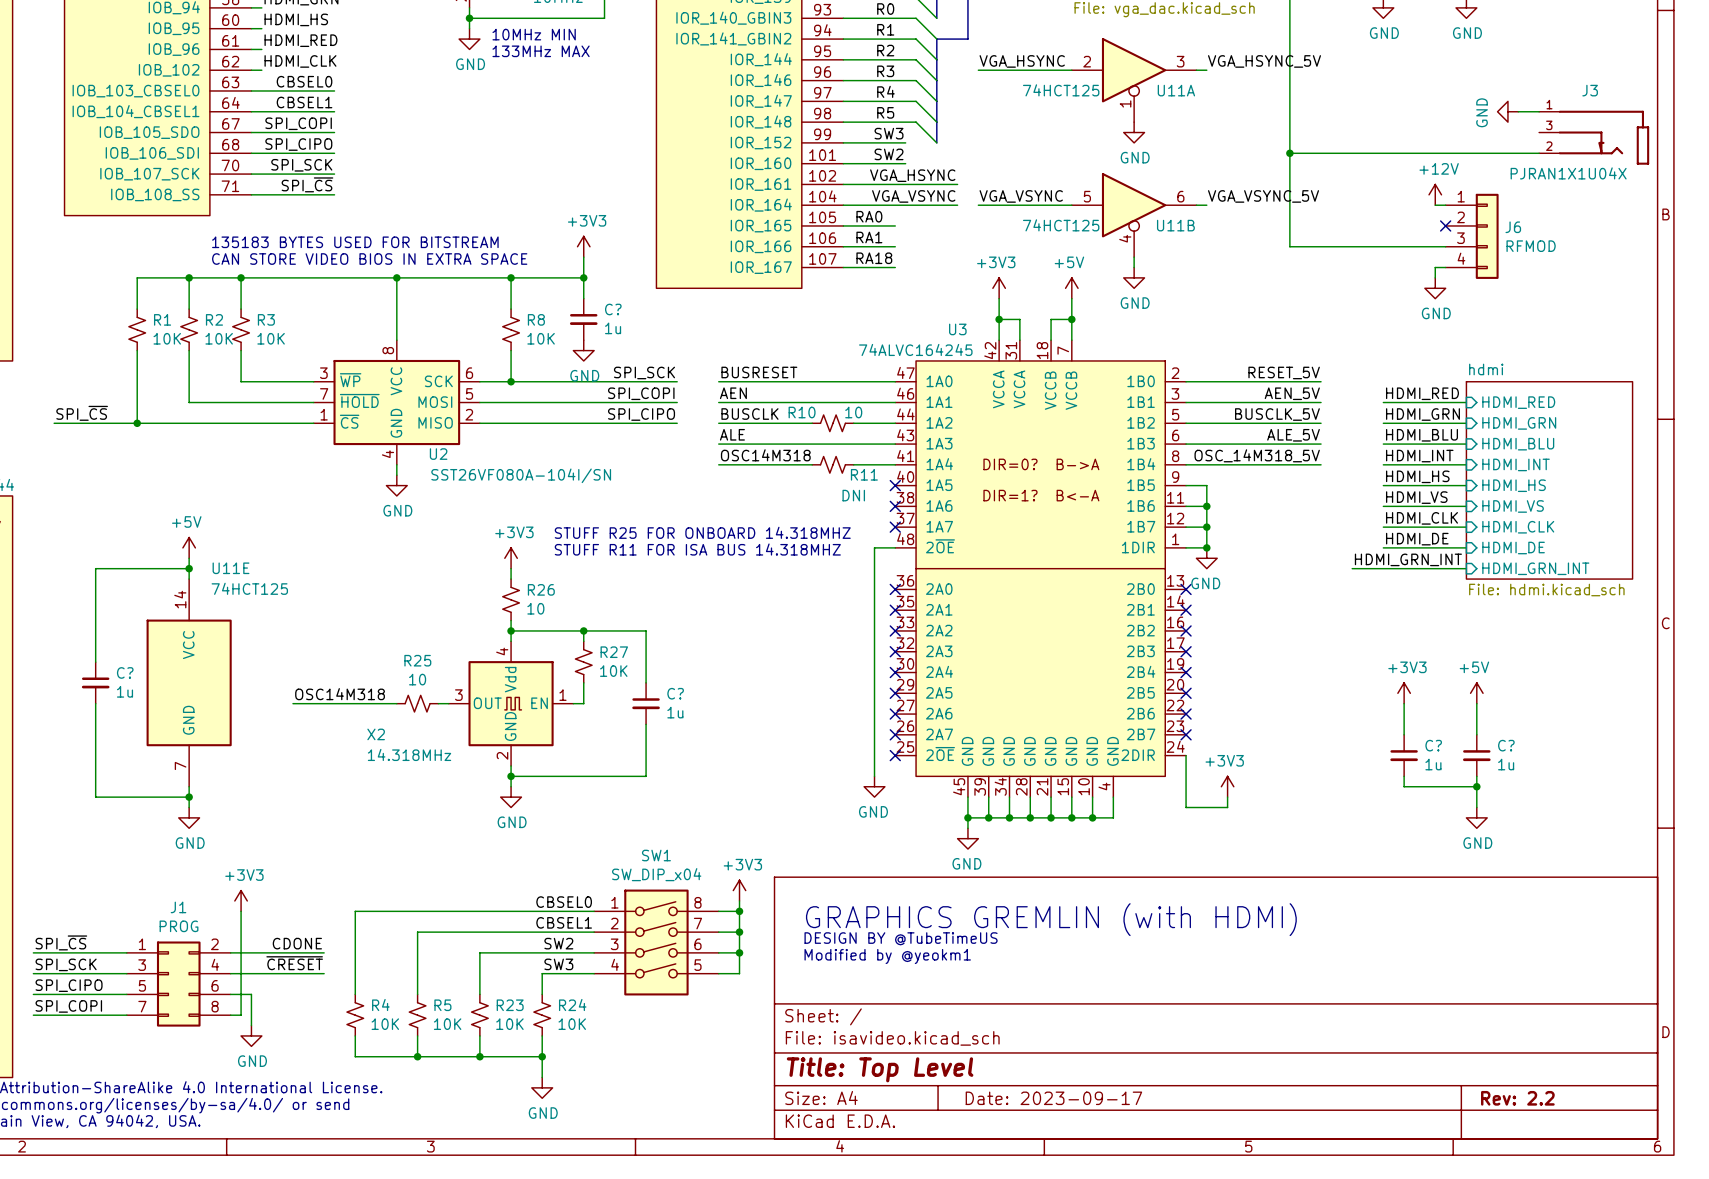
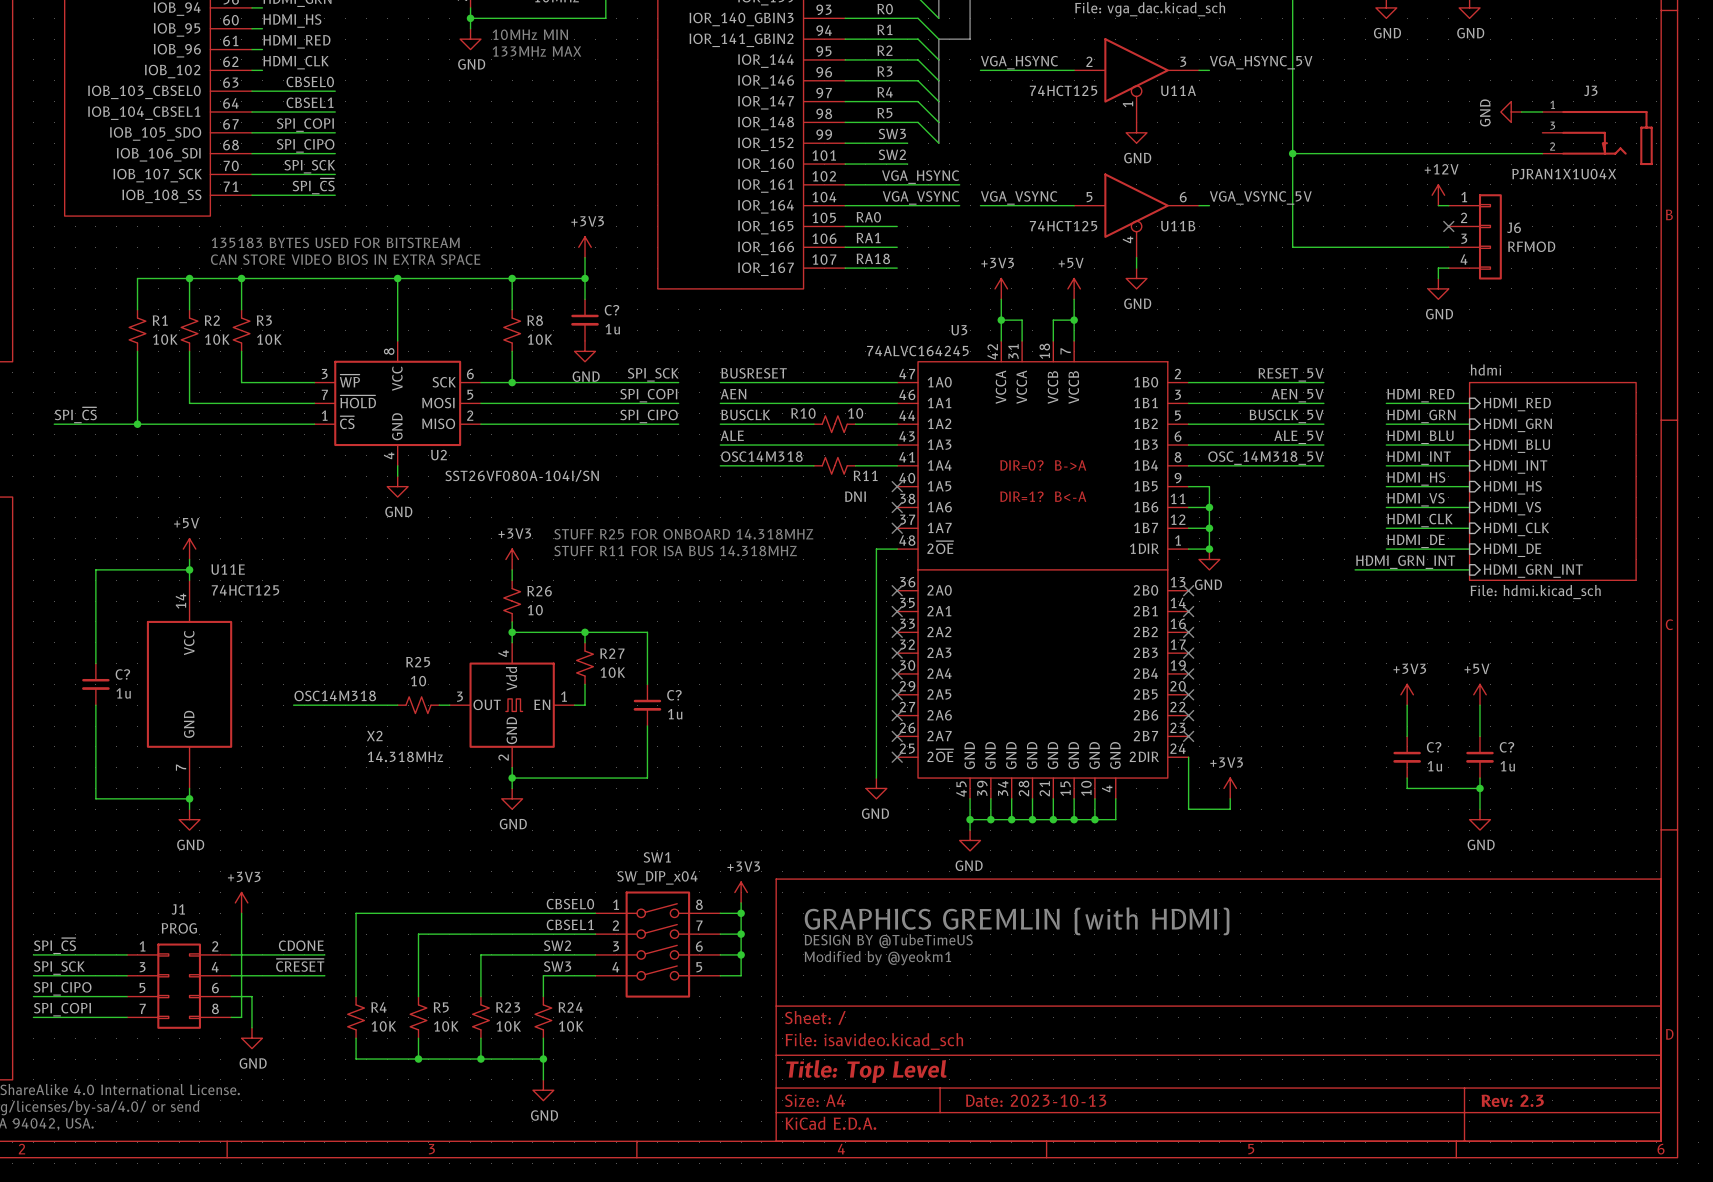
title block: Date: 2023-09-17 (1053, 1098) -> Date: 2023-10-13 (1036, 1100)
title block: Rev: 2.2 (1517, 1098) -> Rev: 2.3 (1512, 1100)

